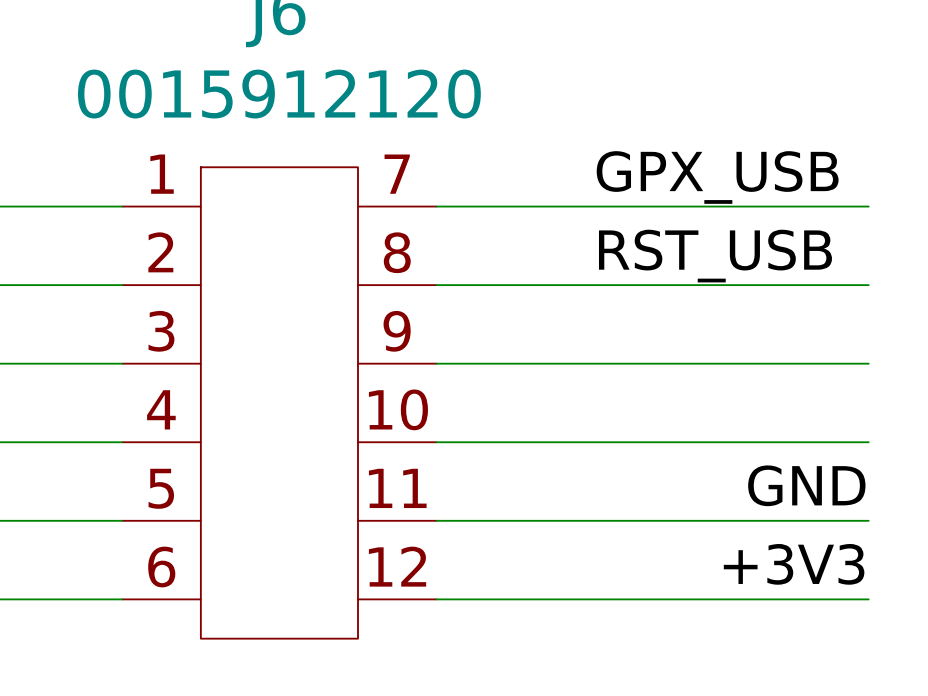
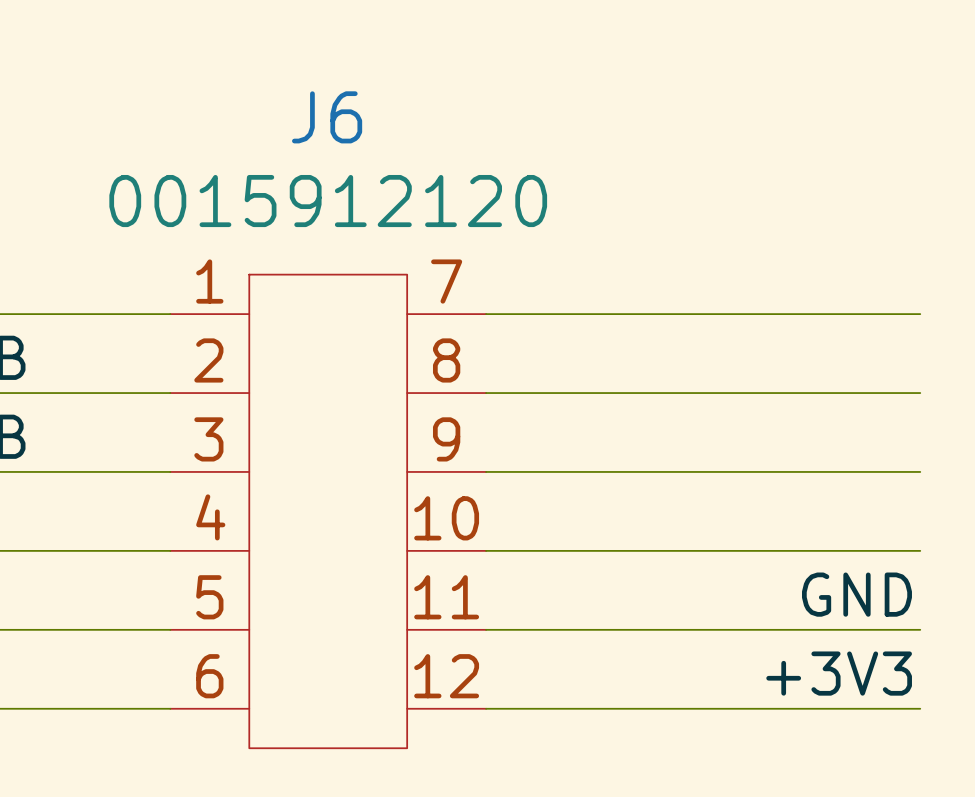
label: GPX_USB (717, 177) -> none
label: RST_USB (715, 256) -> none

